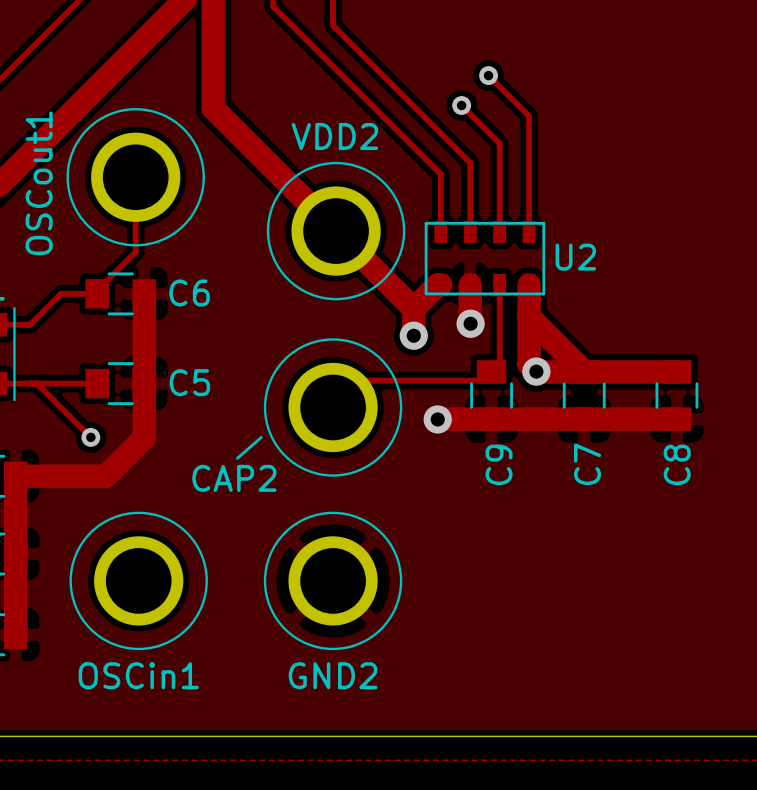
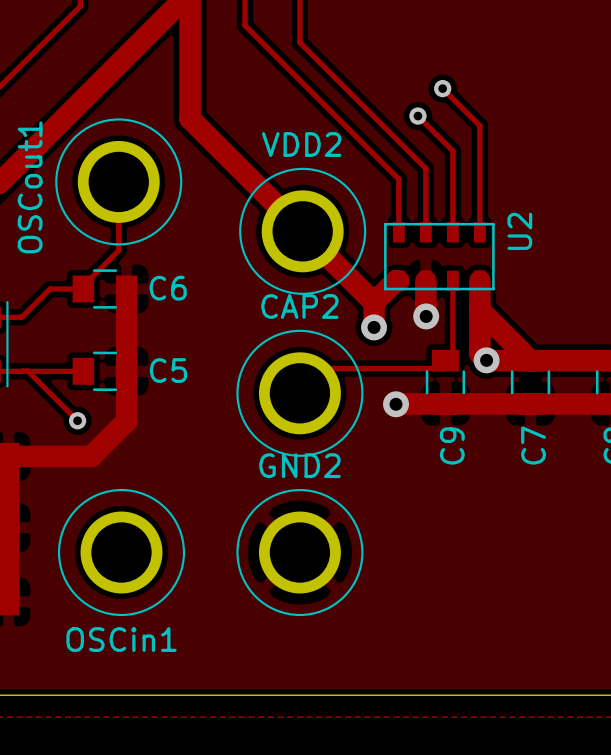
U2 name rotation: 0° (575, 257) -> 90° counterclockwise (519, 231)
line: (261, 437) (237, 458) -> none
CAP2 name position: CAP2 (234, 478) -> CAP2 (299, 306)
GND2 name position: GND2 (333, 675) -> GND2 (299, 465)

